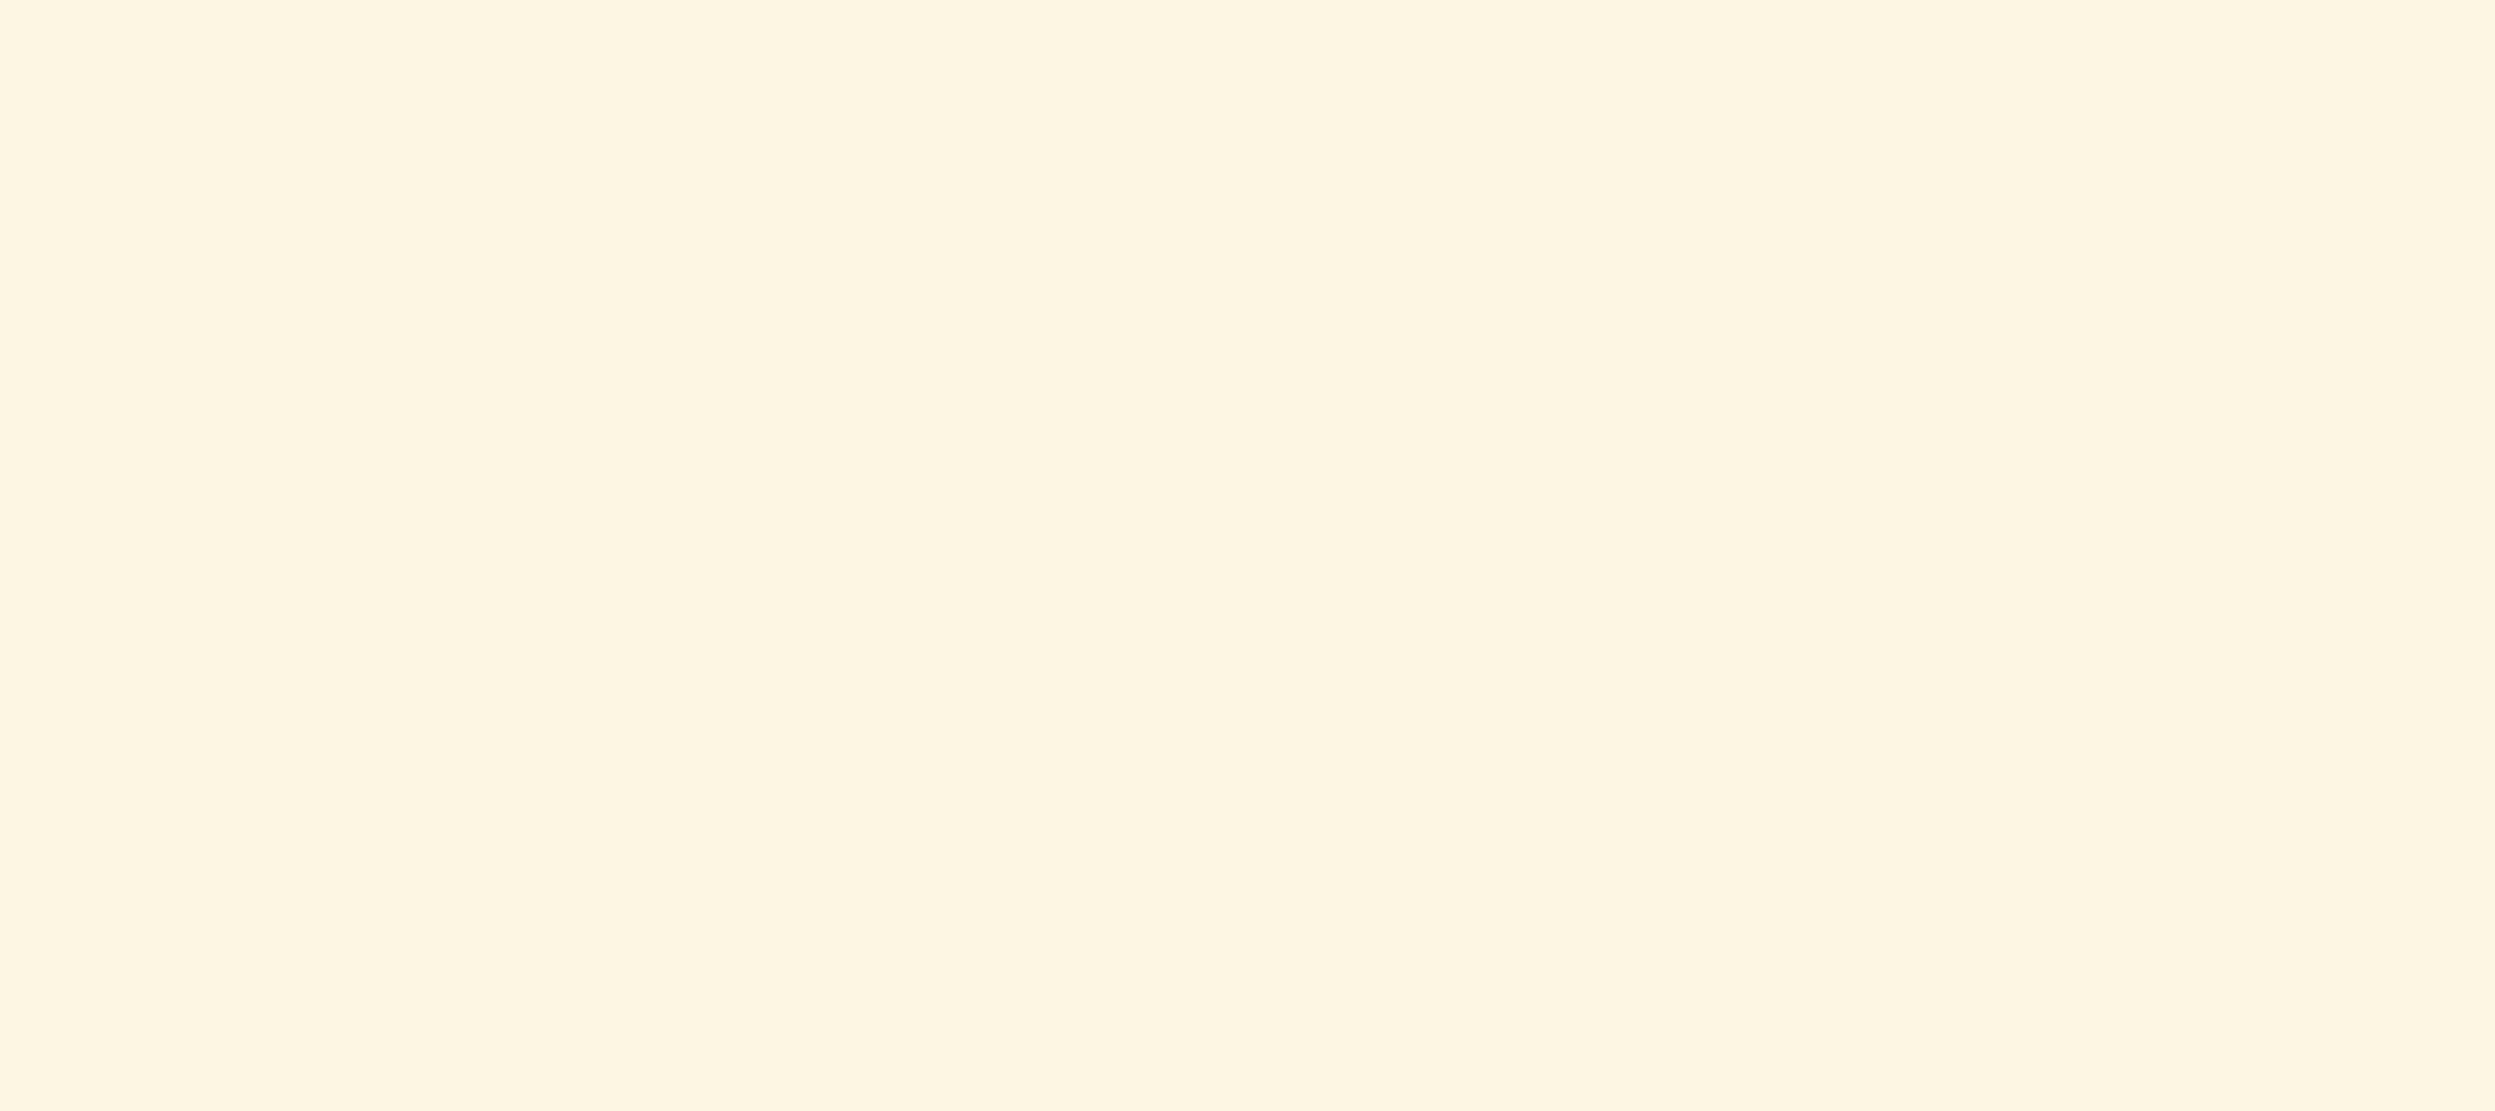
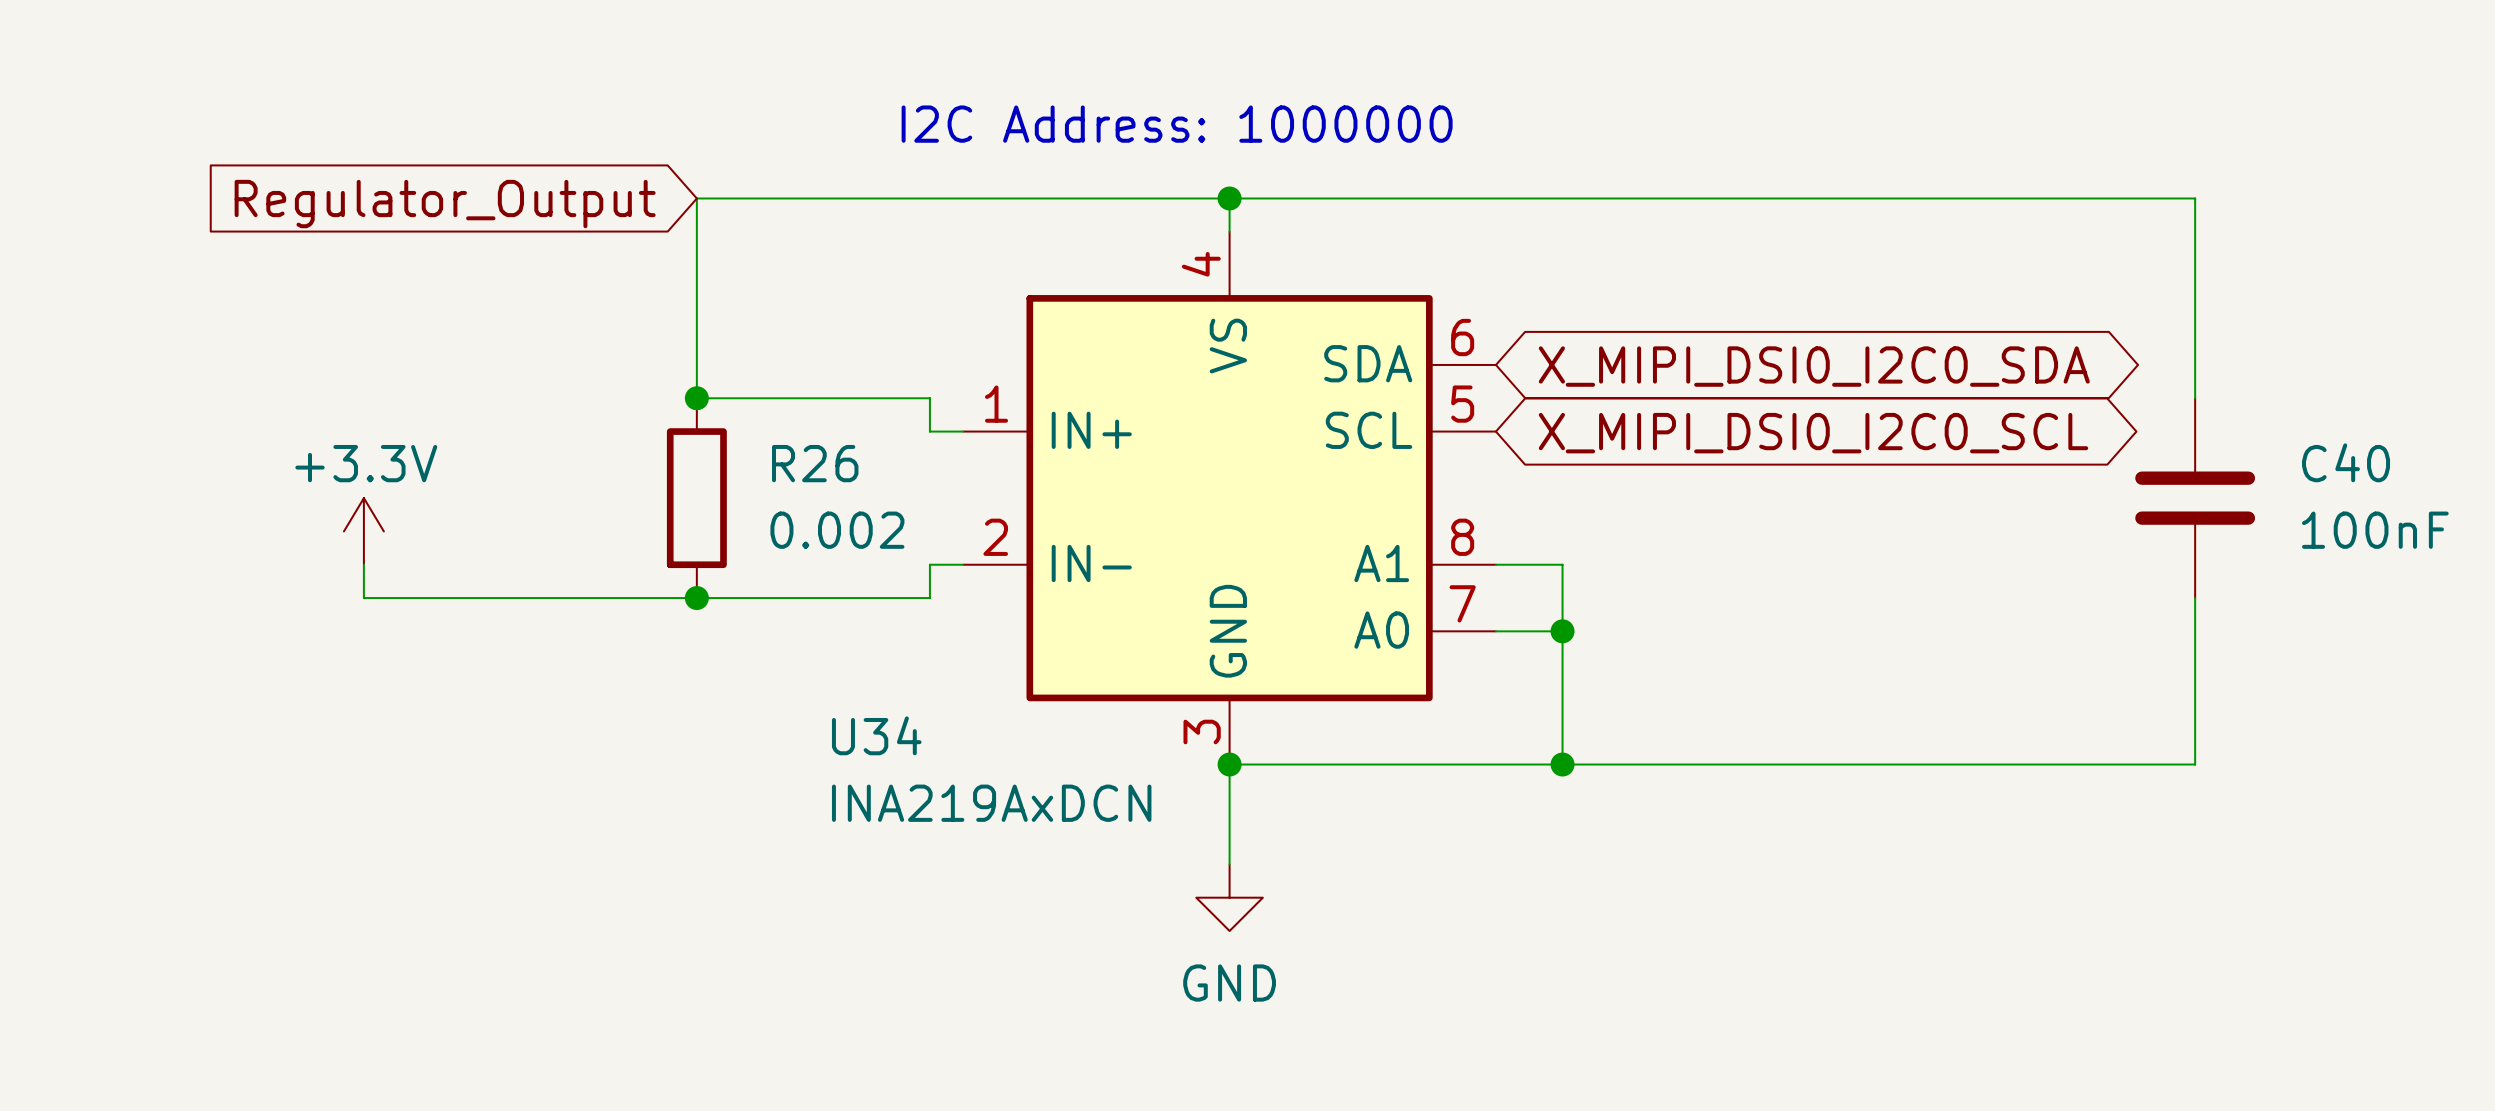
text: none -> I2C Address: 1000000 (1177, 124)
wire: none -> (1229, 198) (1229, 231)
junction: none -> (1229, 198)
global label: none -> Regulator_Output (445, 204)
global label: none -> X_MIPI_DSI0_I2C0_SDA (1814, 366)
junction: none -> (696, 398)
wire: none -> (2195, 398) (2195, 198) (696, 198) (696, 398) (929, 398) (929, 431) (963, 431)
global label: none -> X_MIPI_DSI0_I2C0_SCL (1813, 433)
R26: none -> 0.002 (696, 498)
U34: none -> INA219AxDCN (1229, 498)
C40: none -> 100nF (2195, 498)
power symbol: none -> +3.3V (363, 531)
wire: none -> (363, 564) (363, 598) (929, 598) (929, 564) (963, 564)
wire: none -> (1495, 564) (1562, 564) (1562, 764)
junction: none -> (696, 598)
wire: none -> (2195, 598) (2195, 764) (1229, 764) (1229, 864)
wire: none -> (1495, 631) (1562, 631)
junction: none -> (1562, 631)
junction: none -> (1229, 764)
junction: none -> (1562, 764)
power symbol: none -> GND (1229, 897)

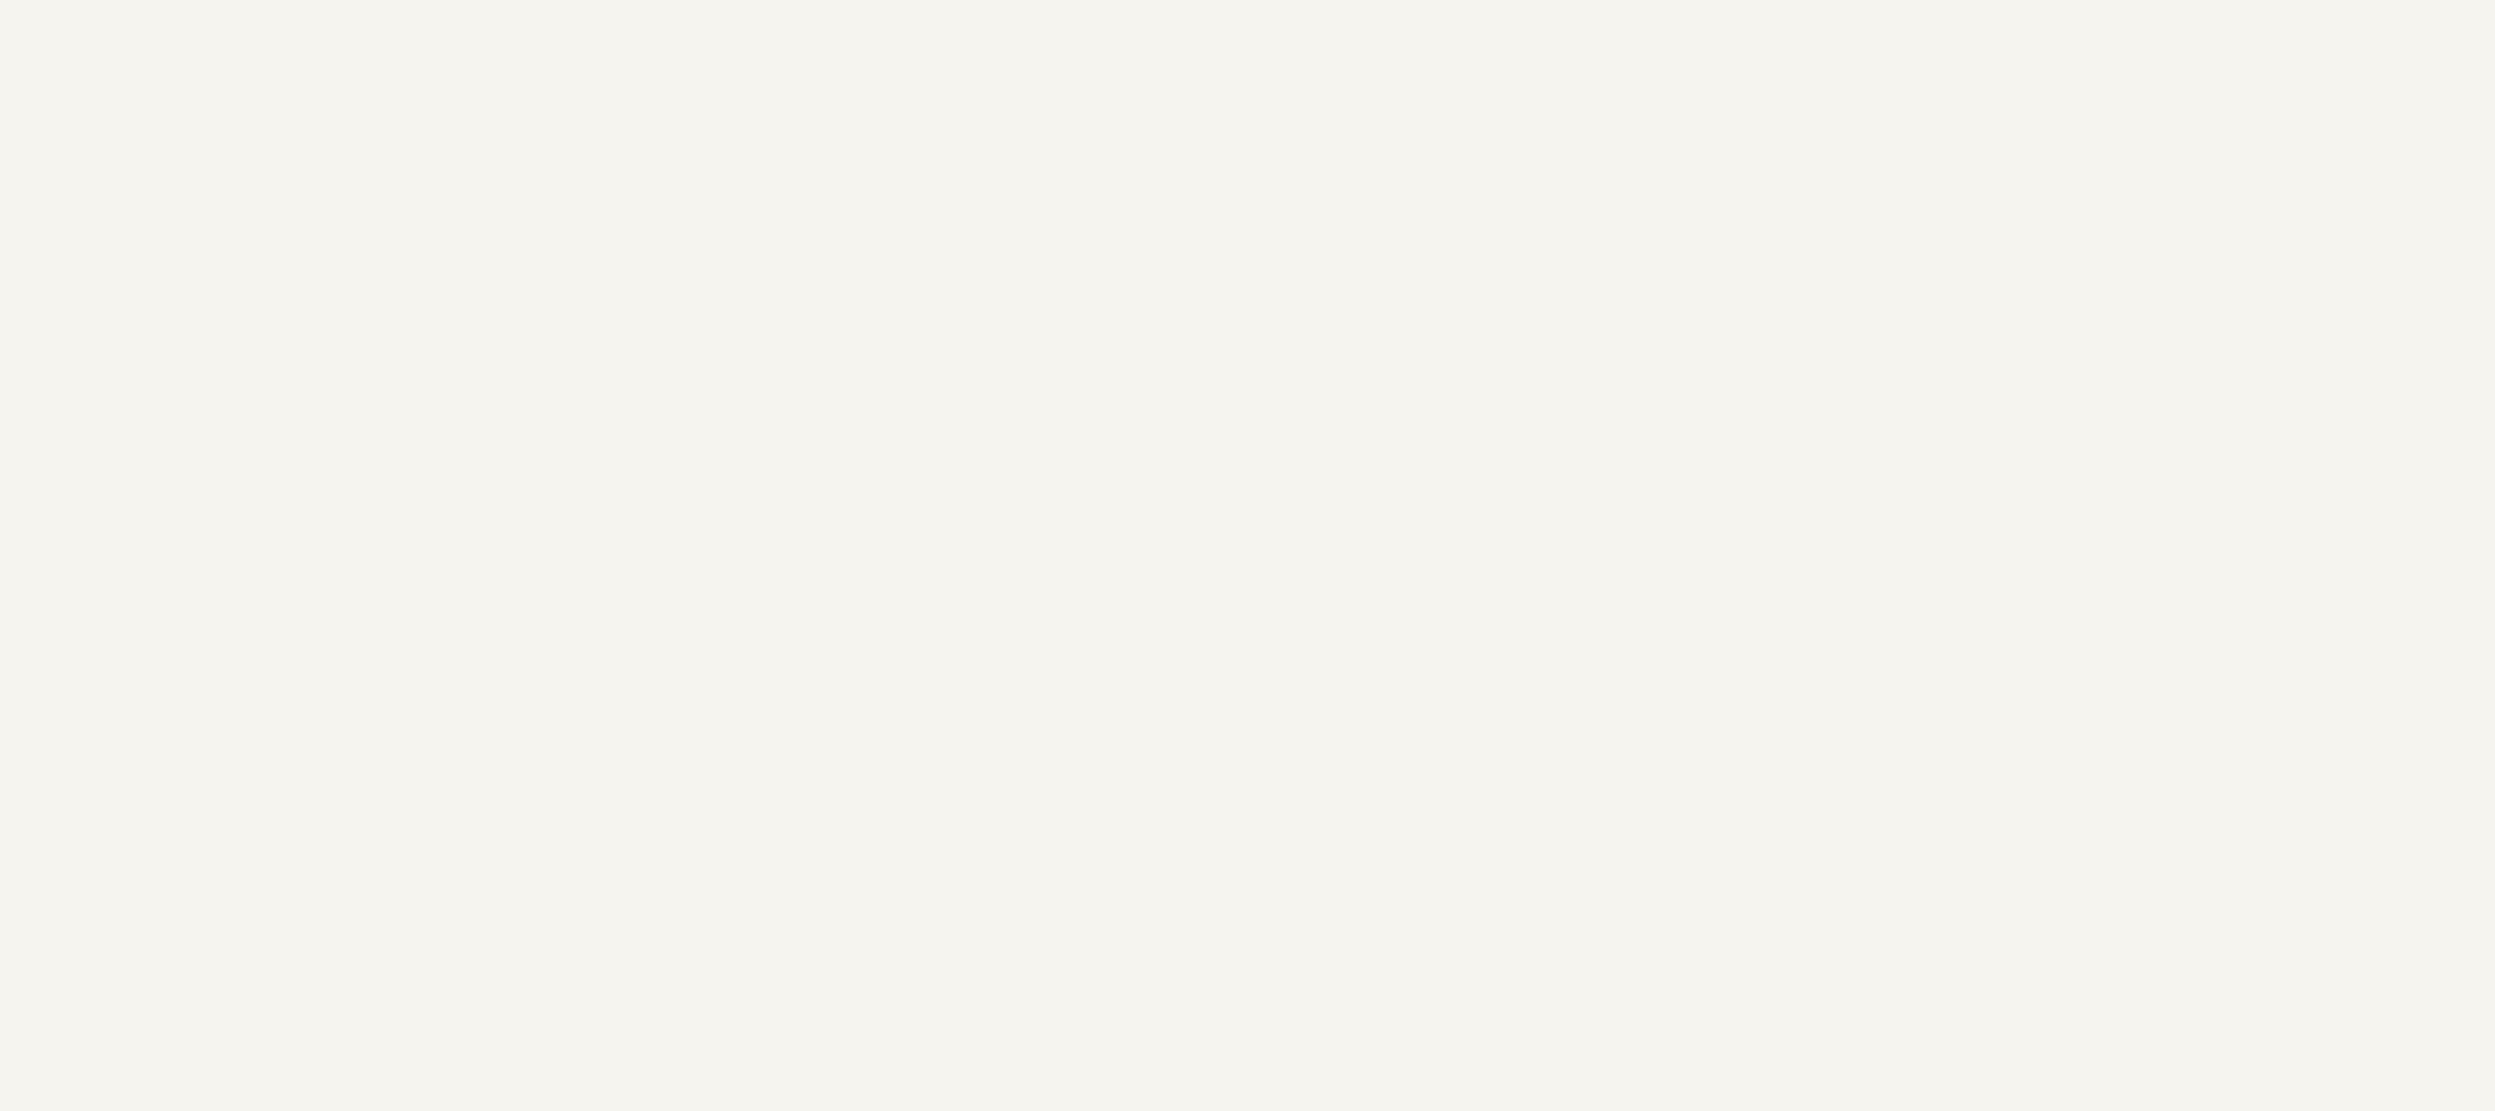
text: I2C Address: 1000000 (1177, 124) -> none
wire: (1229, 198) (1229, 231) -> none
junction: (1229, 198) -> none
global label: Regulator_Output (445, 204) -> none
global label: X_MIPI_DSI0_I2C0_SDA (1814, 366) -> none
junction: (696, 398) -> none
wire: (2195, 398) (2195, 198) (696, 198) (696, 398) (929, 398) (929, 431) (963, 431) -> none
global label: X_MIPI_DSI0_I2C0_SCL (1813, 433) -> none
R26: 0.002 (696, 498) -> none
U34: INA219AxDCN (1229, 498) -> none
C40: 100nF (2195, 498) -> none
power symbol: +3.3V (363, 531) -> none
wire: (363, 564) (363, 598) (929, 598) (929, 564) (963, 564) -> none
wire: (1495, 564) (1562, 564) (1562, 764) -> none
junction: (696, 598) -> none
wire: (2195, 598) (2195, 764) (1229, 764) (1229, 864) -> none
wire: (1495, 631) (1562, 631) -> none
junction: (1562, 631) -> none
junction: (1229, 764) -> none
junction: (1562, 764) -> none
power symbol: GND (1229, 897) -> none

